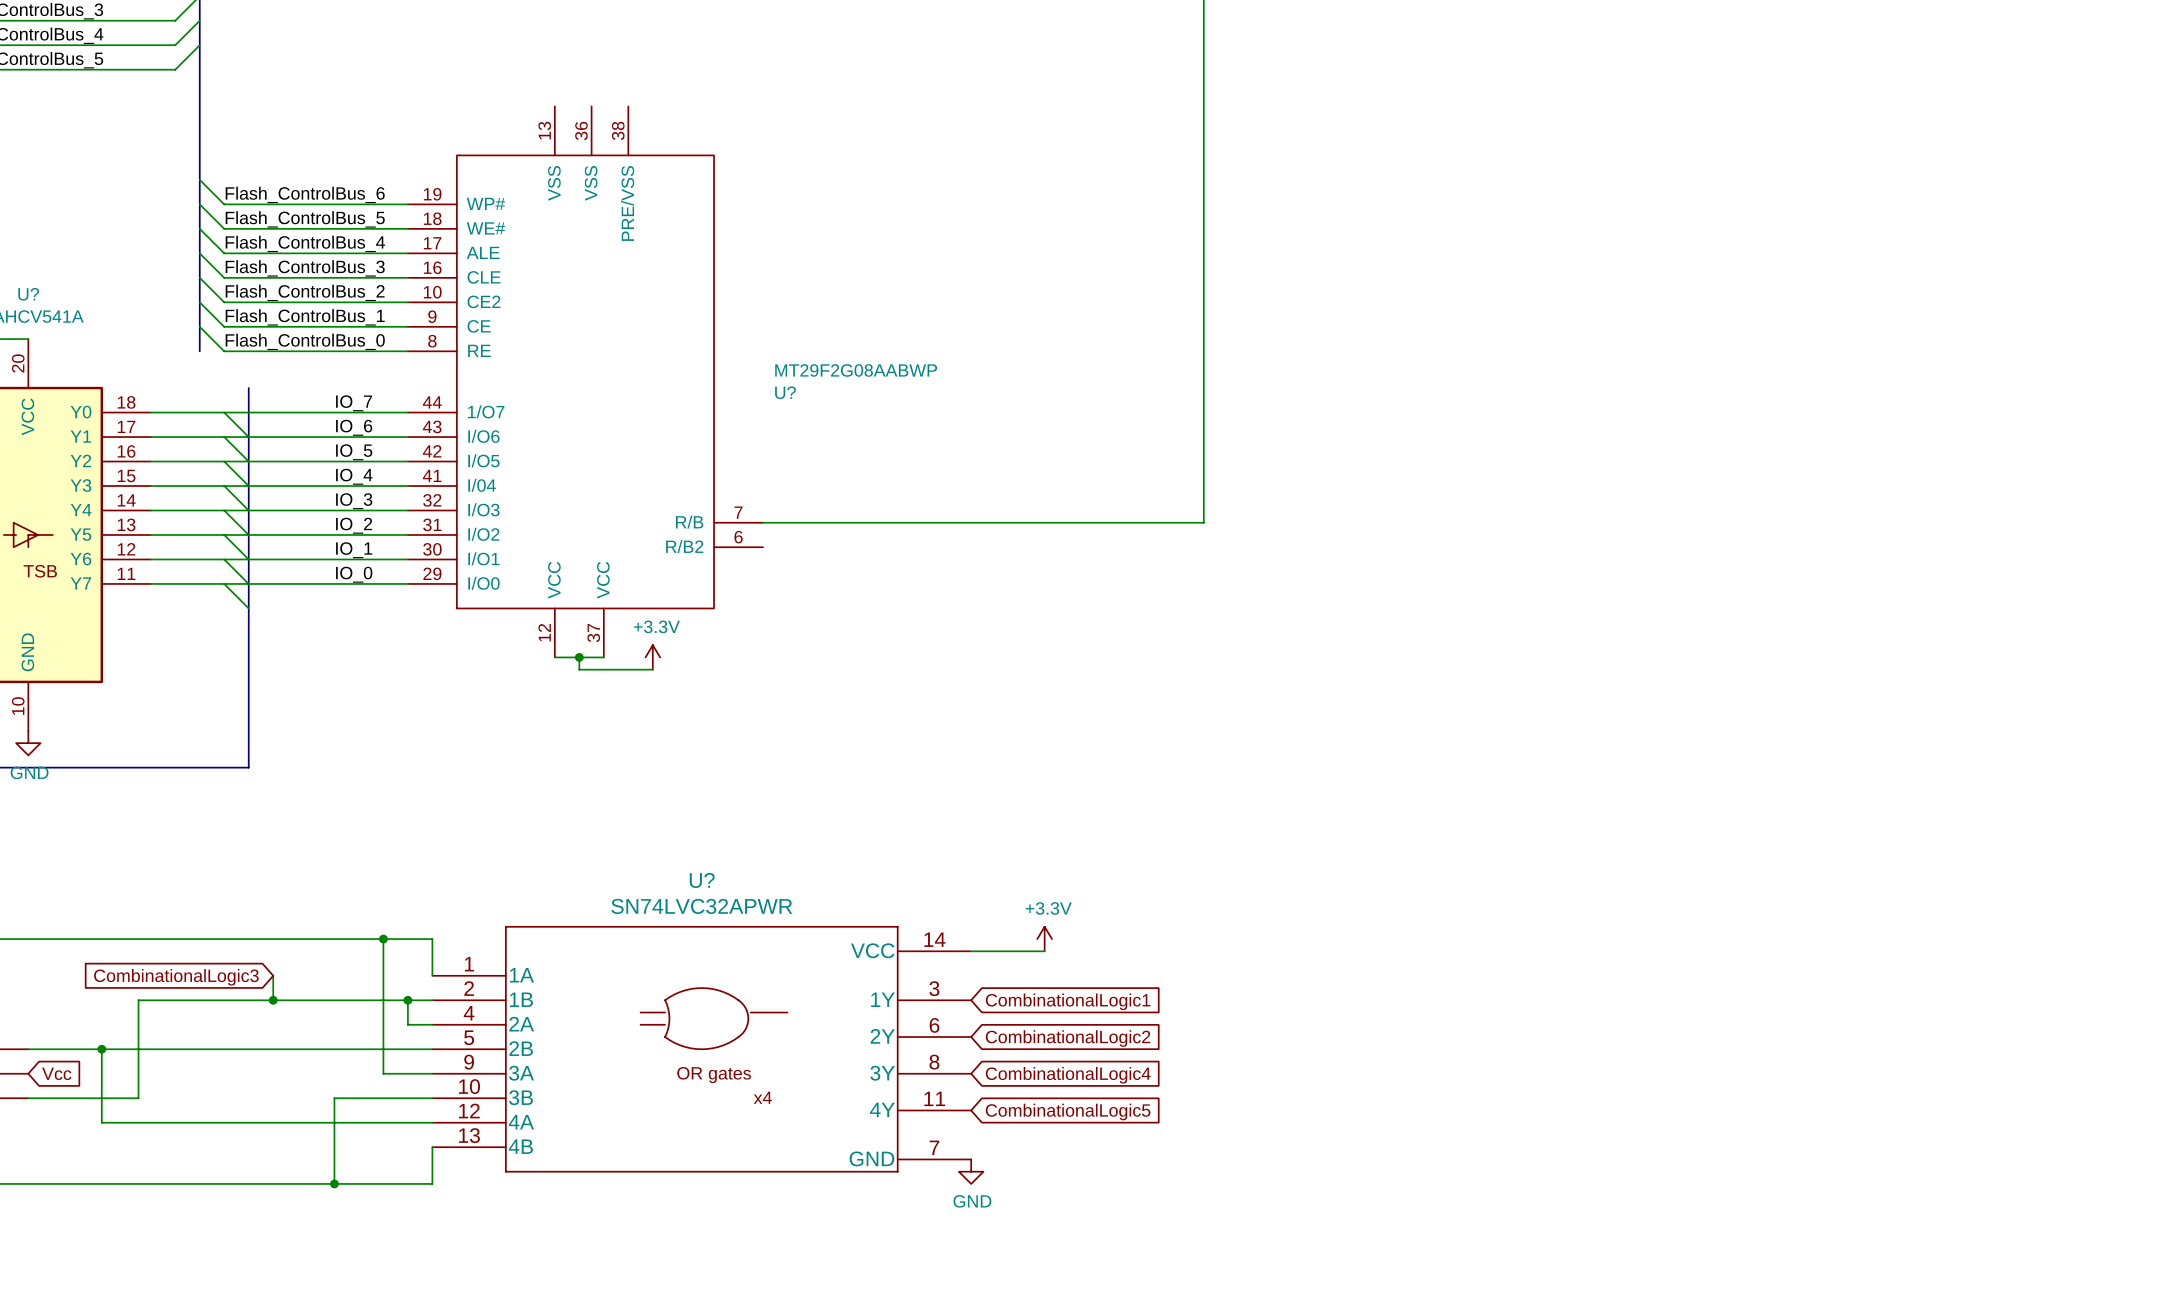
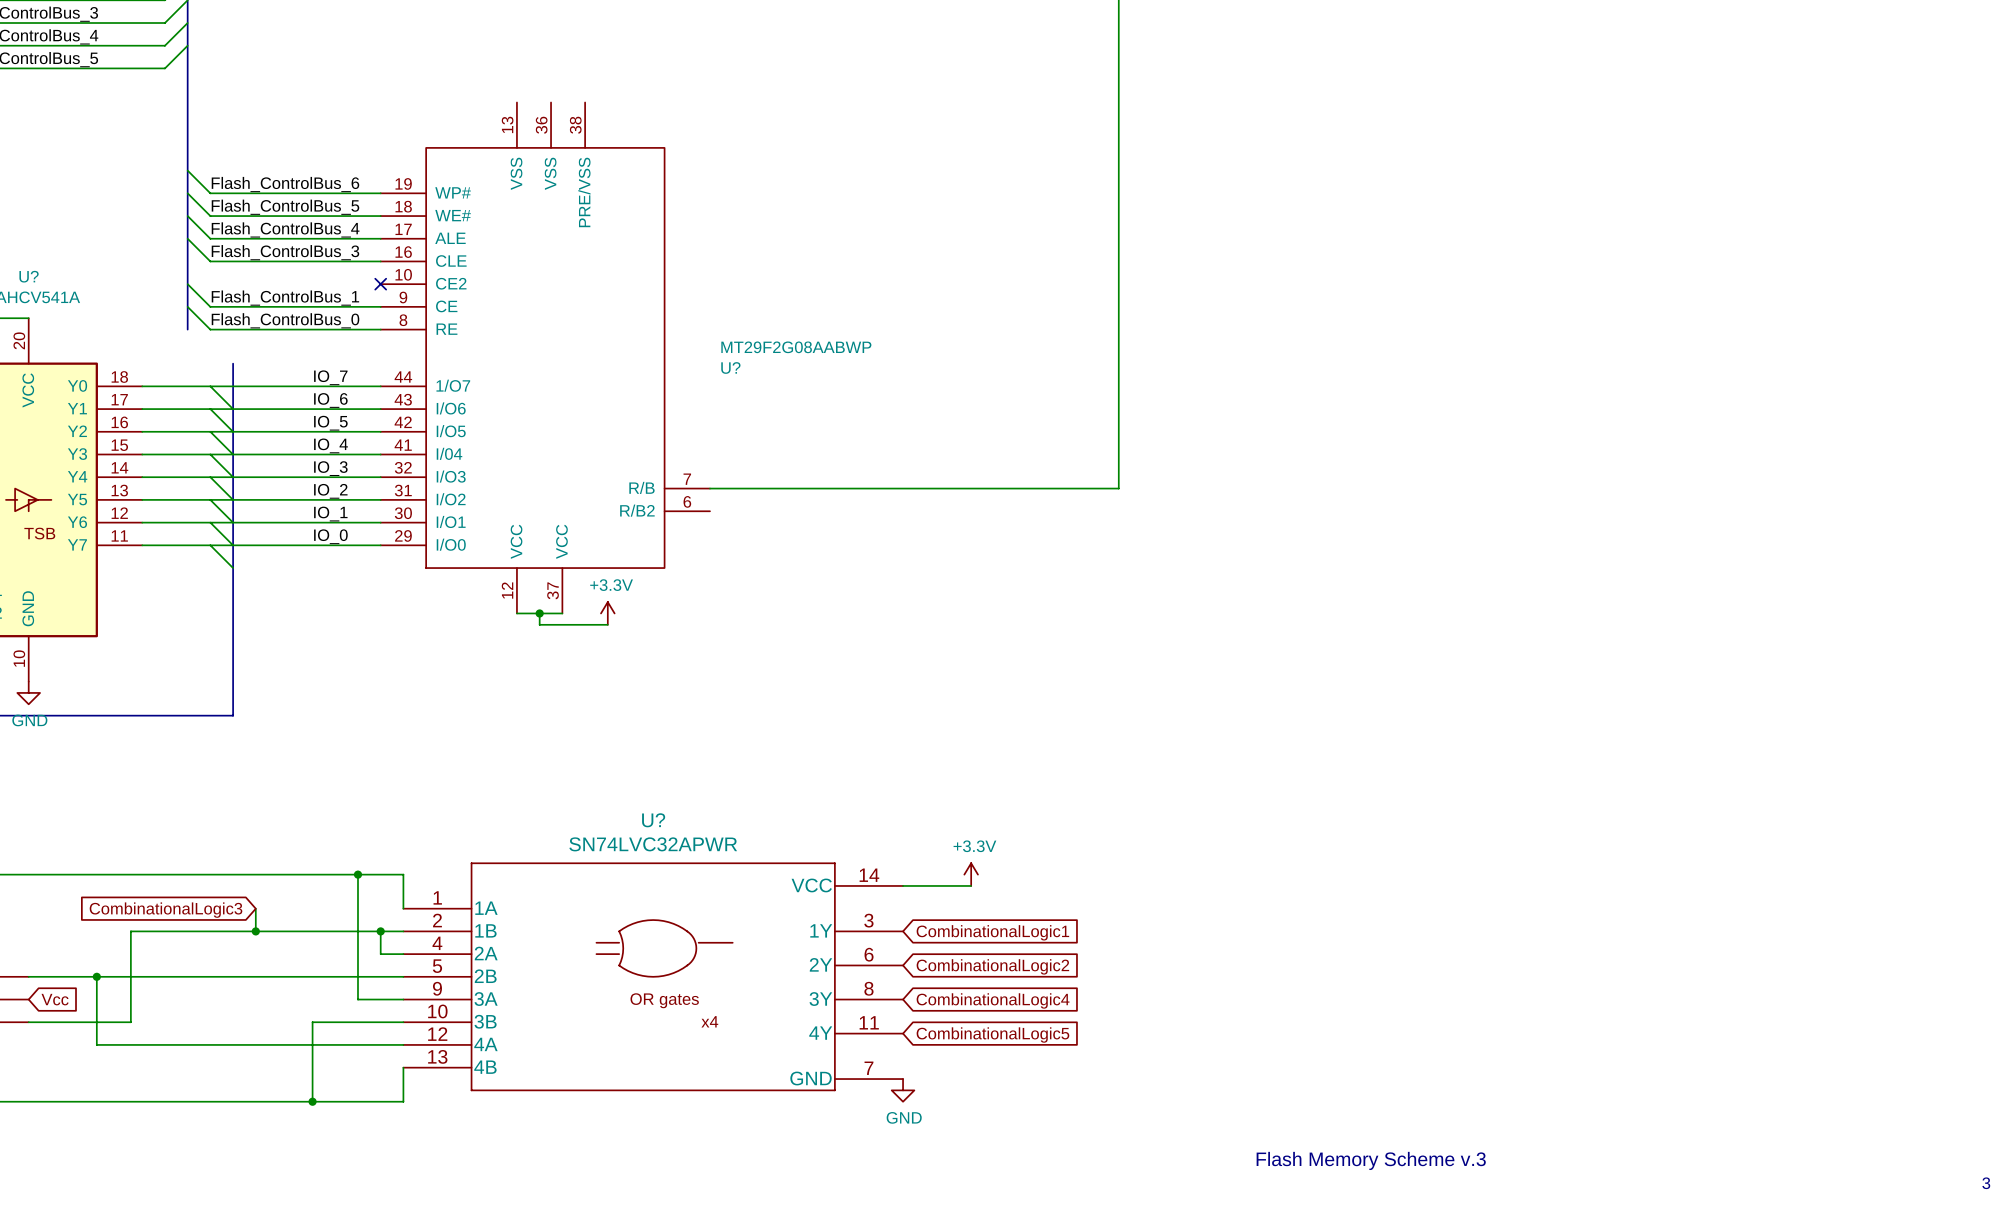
wire: (199, 277) (224, 302) (407, 302) -> none
label: Flash_ControlBus_2 (305, 292) -> none
no-connect mark: none -> (380, 284)
text: none -> Flash Memory Scheme v.3 (1371, 1160)
text: none -> 3 (1986, 1183)

